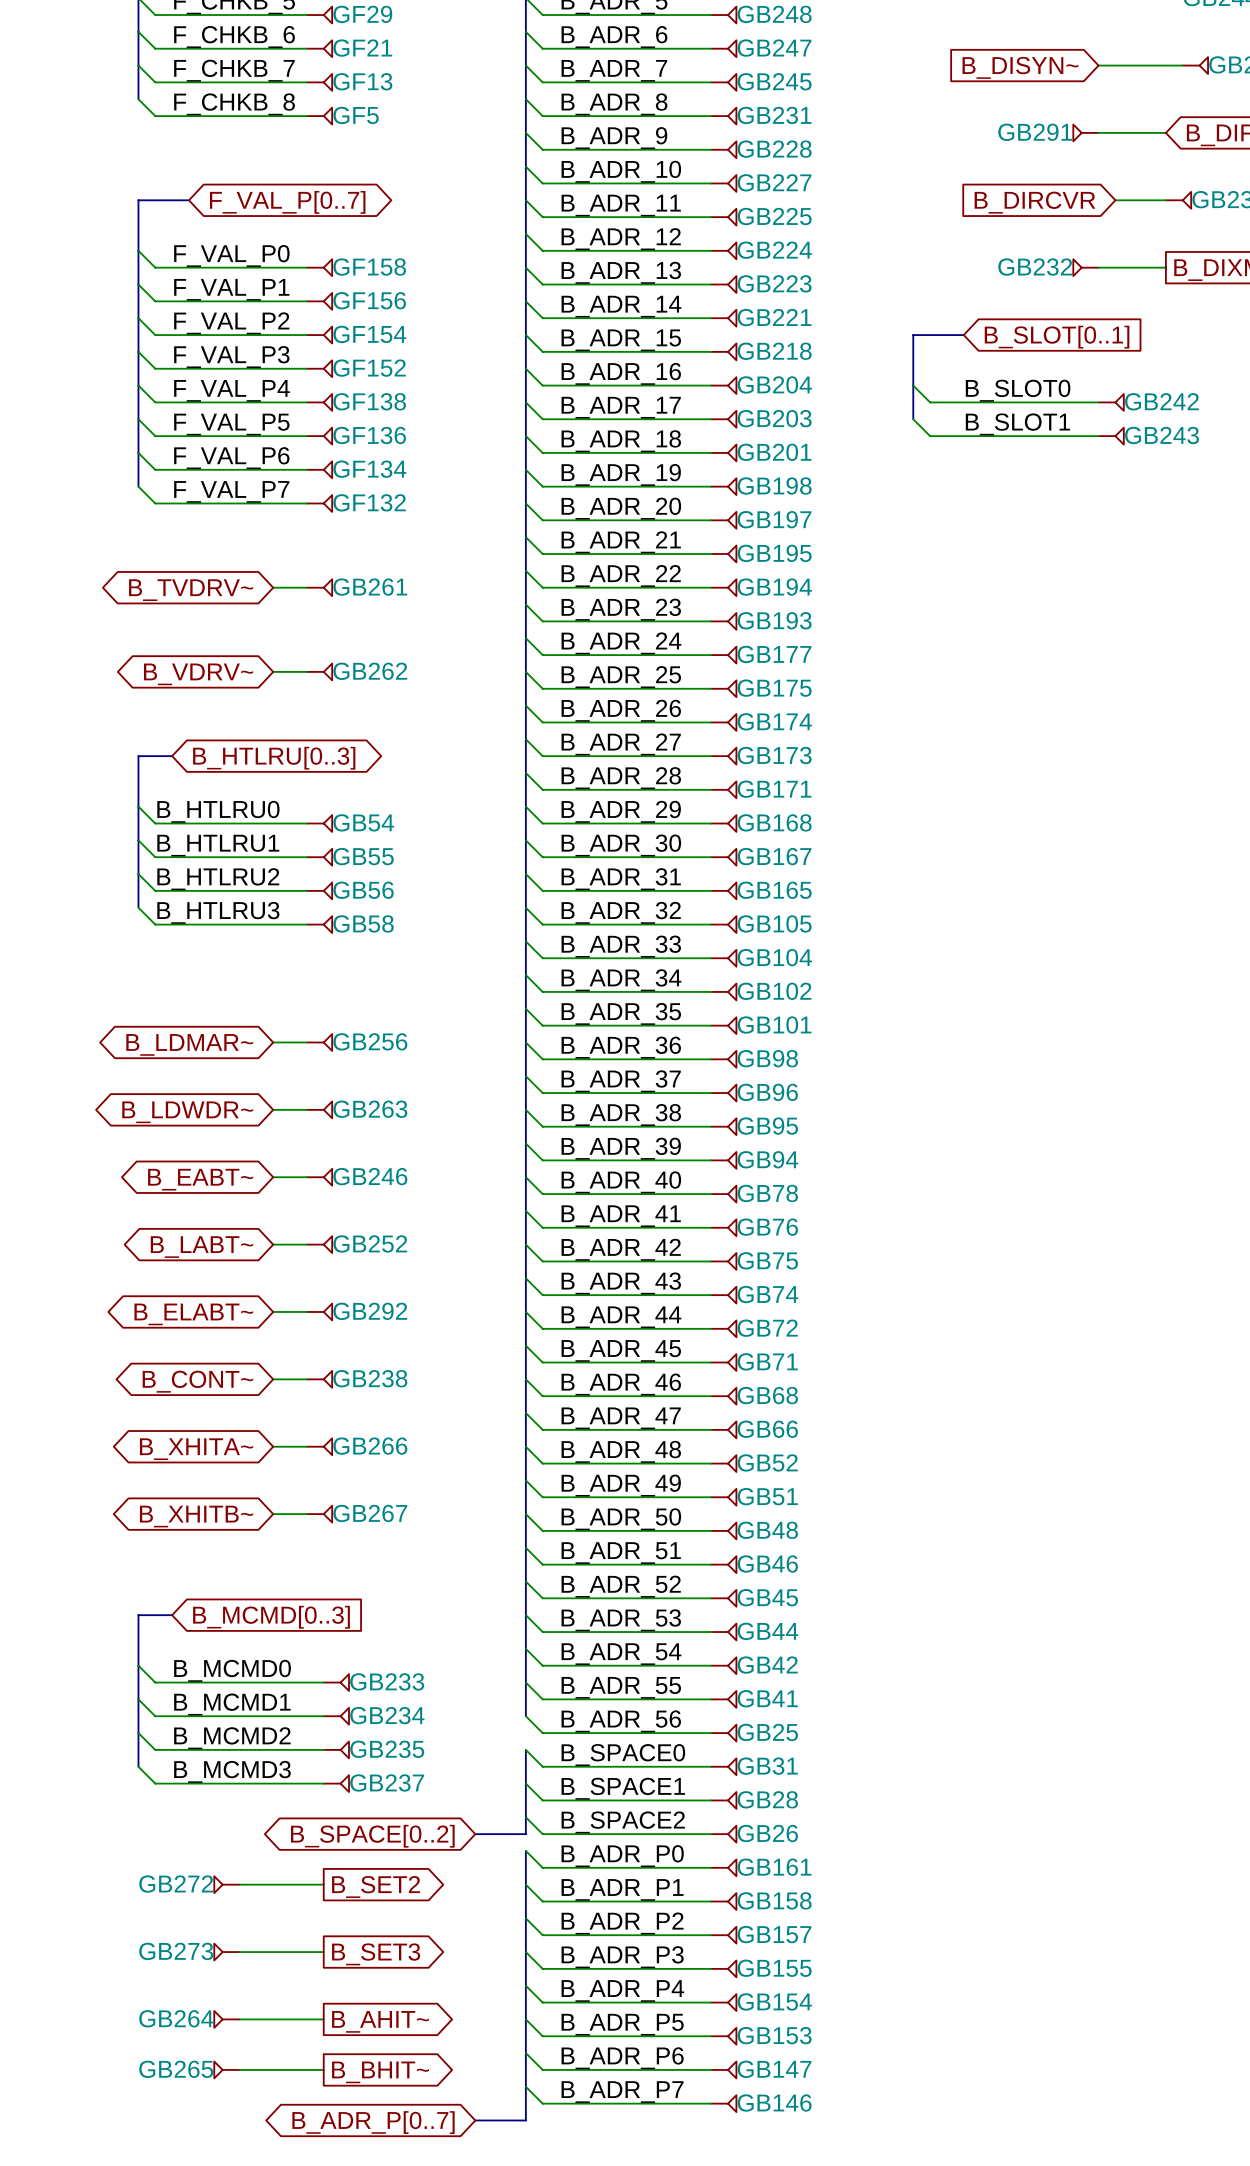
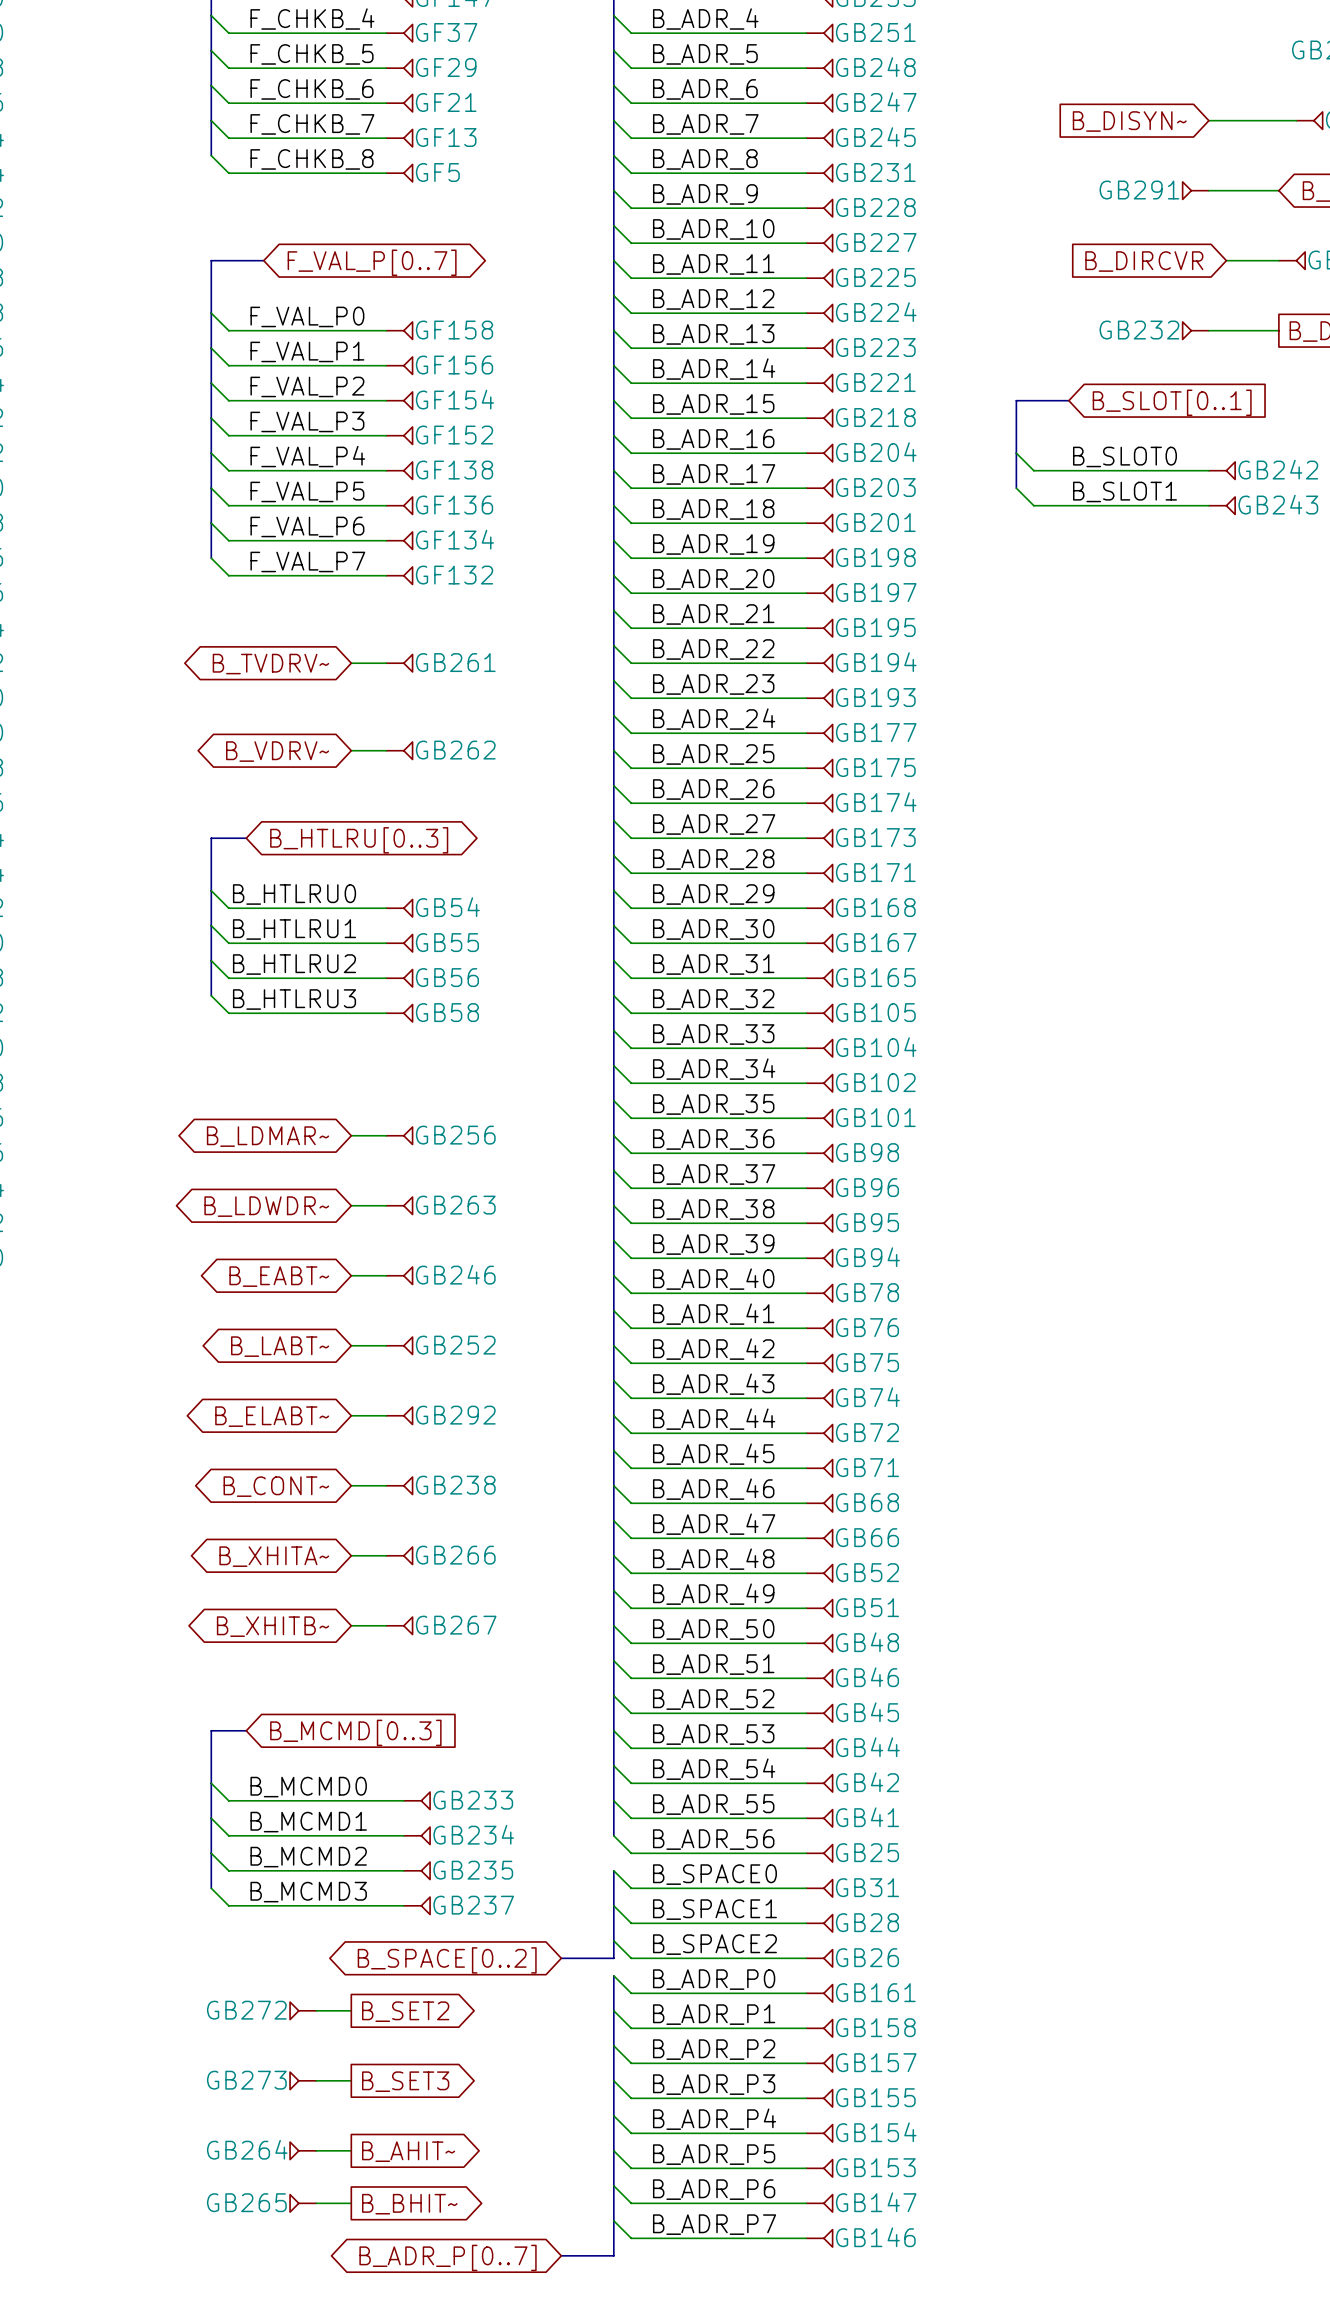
wire: (273, 1884) (323, 1884) -> none
global label position: B_SET2 (376, 1886) -> B_SET2 (405, 2011)
wire: (273, 1952) (323, 1952) -> none
global label position: B_SET3 (376, 1954) -> B_SET3 (405, 2081)
wire: (273, 2019) (323, 2019) -> none
global label position: B_AHIT~ (380, 2021) -> B_AHIT~ (408, 2151)
wire: (273, 2069) (323, 2069) -> none
global label position: B_BHIT~ (380, 2072) -> B_BHIT~ (409, 2204)

